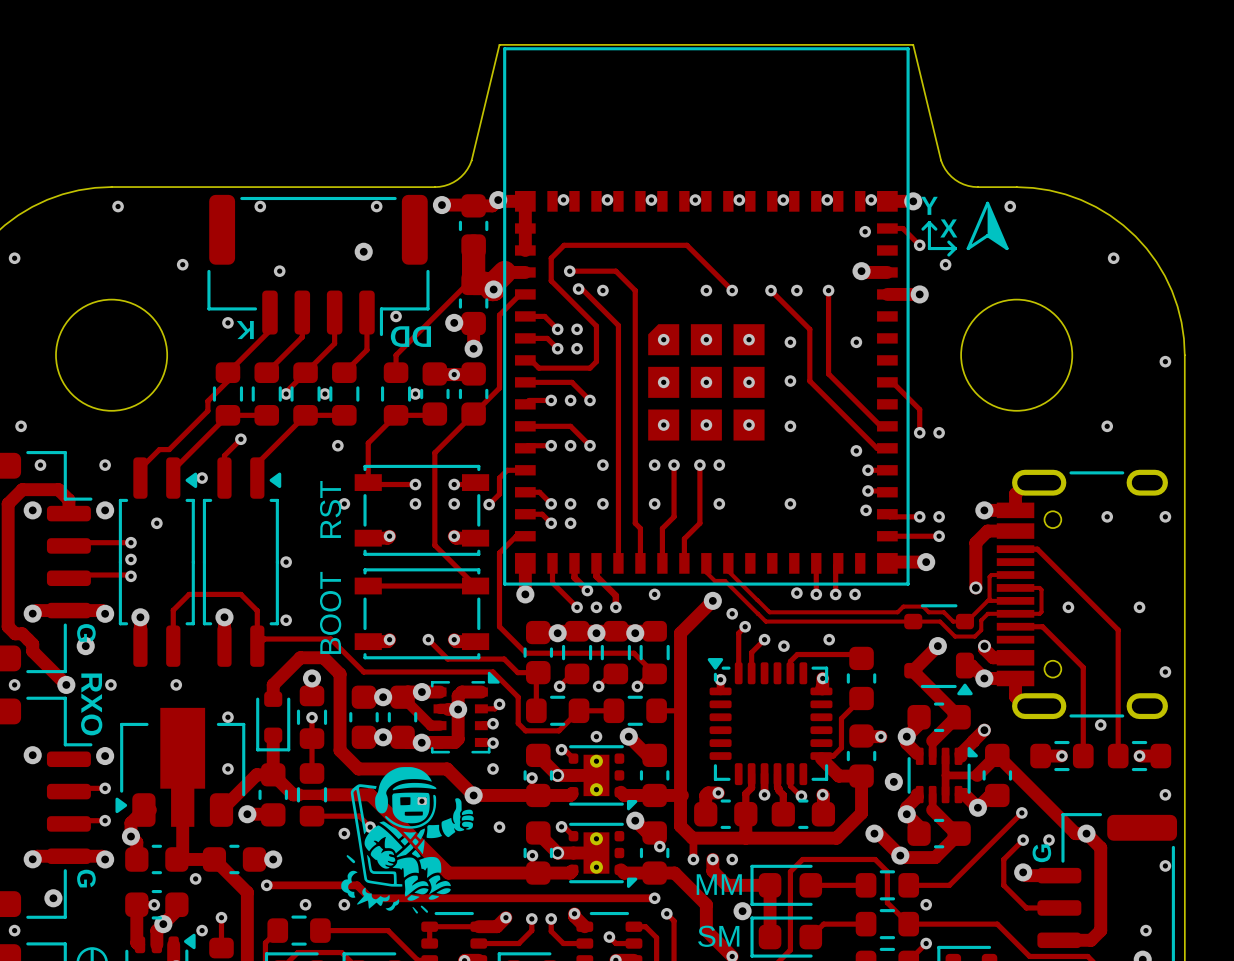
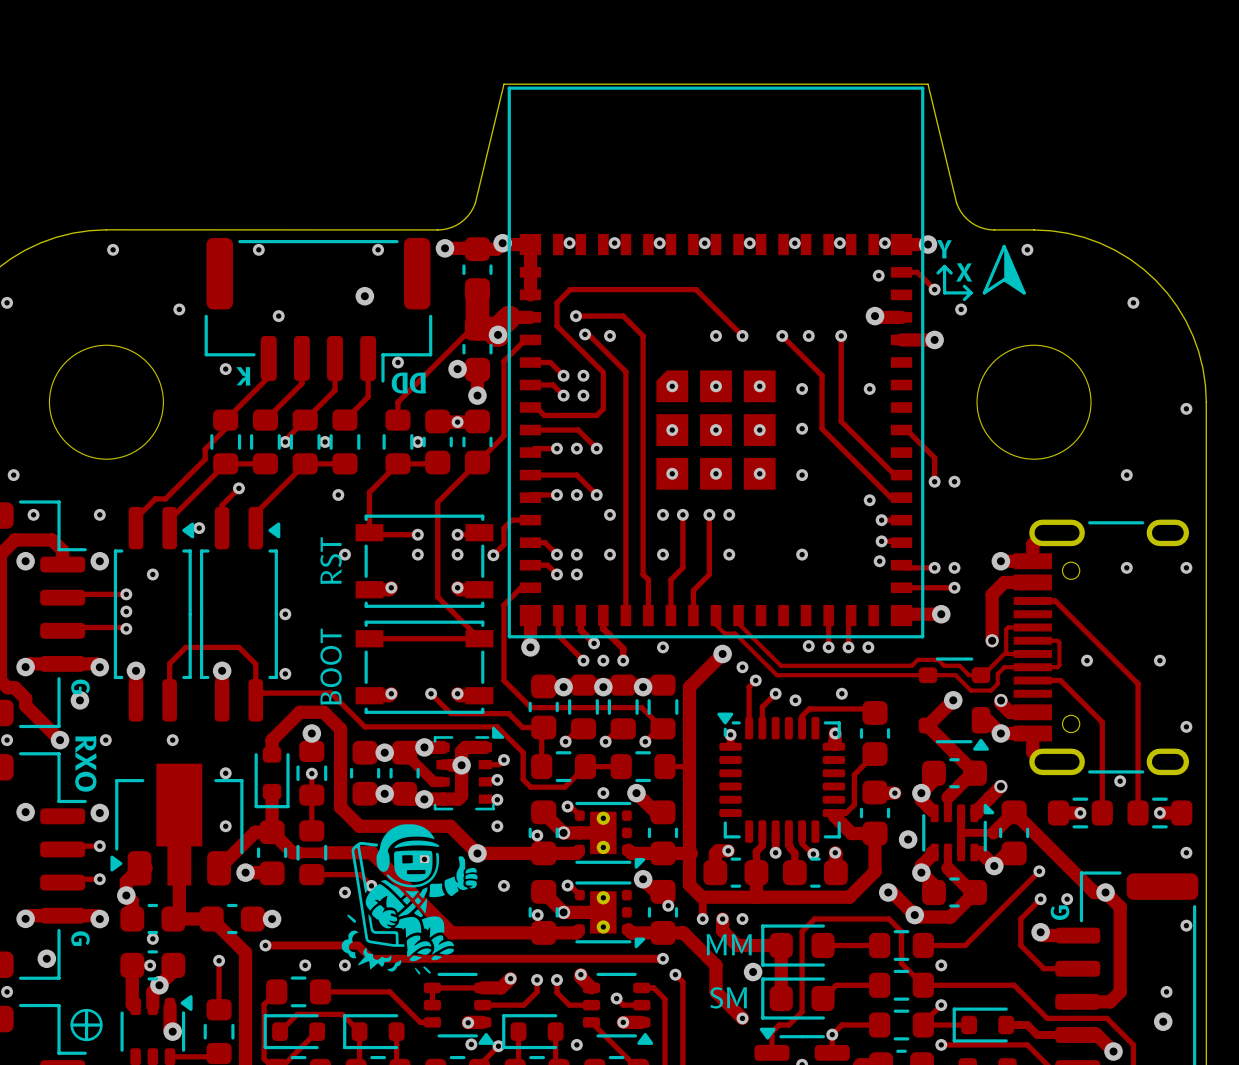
via: none -> (152, 938)
via: (195, 878) -> none
track: none -> (219, 960) (219, 978)
via: none -> (219, 960)
via: (221, 917) -> none
via: (202, 930) -> none

